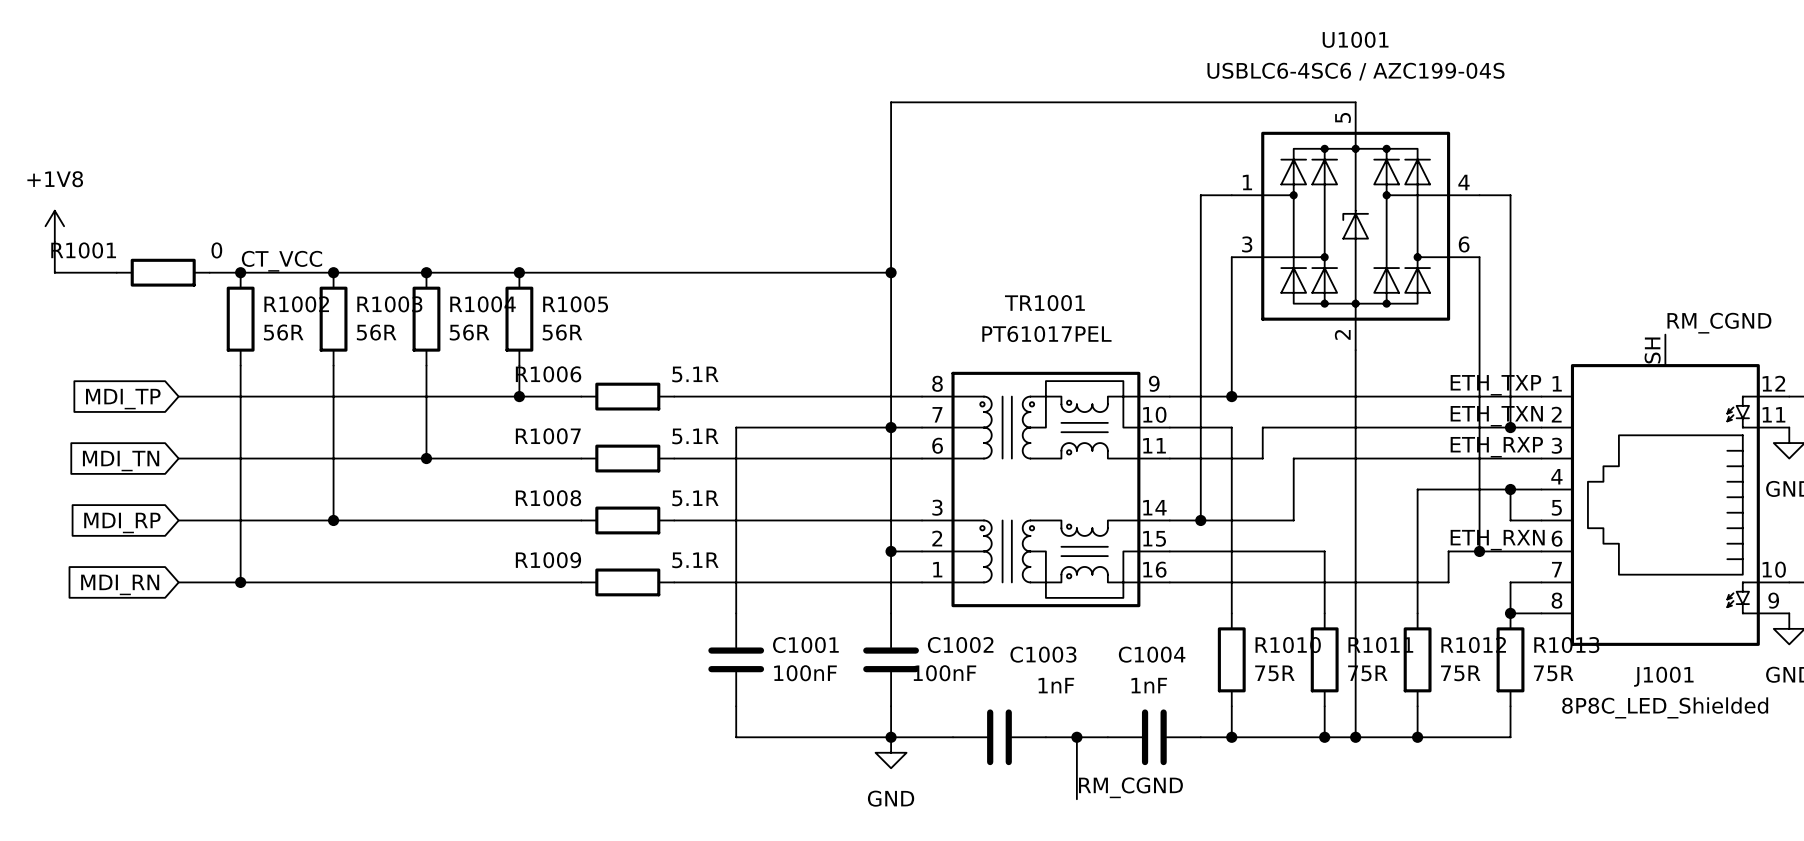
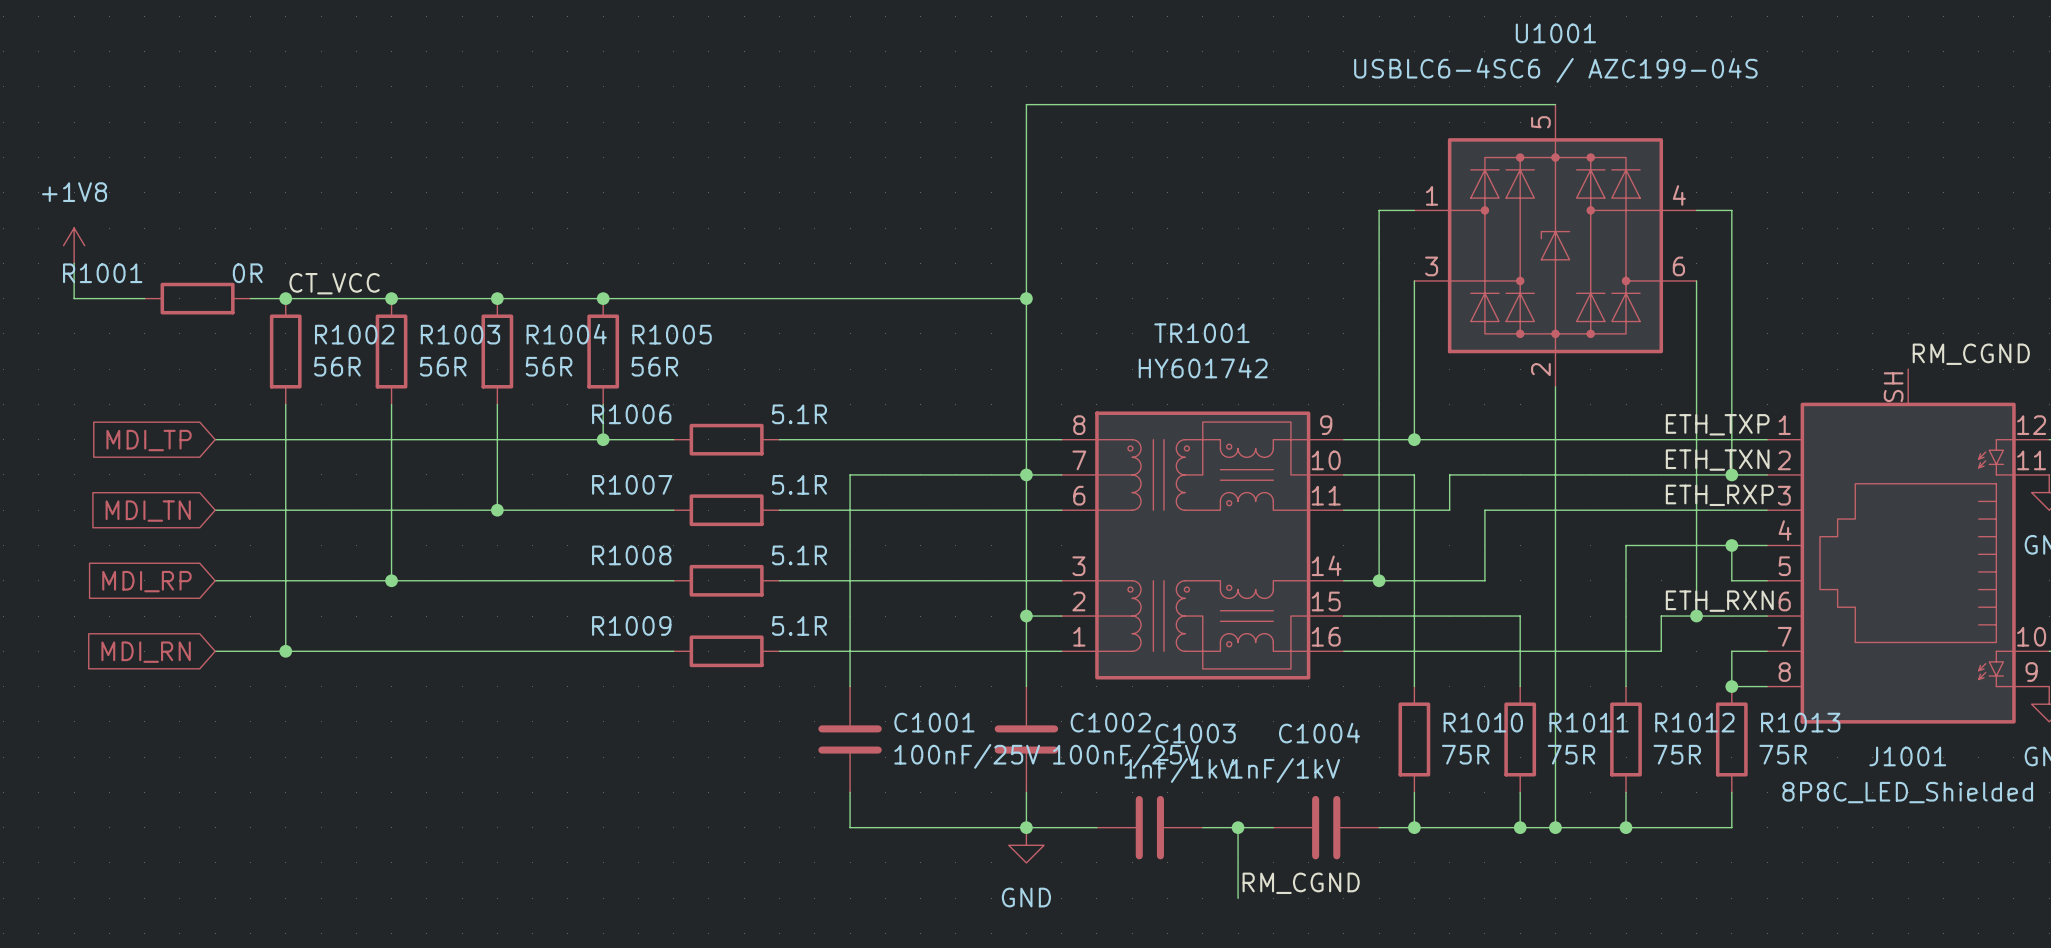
R1001 value: 0 (216, 250) -> 0R (247, 273)
TR1001 value: PT61017PEL (1046, 334) -> HY601742 (1203, 368)
C1001 value: 100nF (805, 673) -> 100nF/25V (967, 756)
C1002 value: 100nF (944, 673) -> 100nF/25V (1125, 756)
C1003 value: 1nF (1056, 685) -> 1nF/1kV (1179, 770)
C1004 value: 1nF (1149, 685) -> 1nF/1kV (1285, 770)

